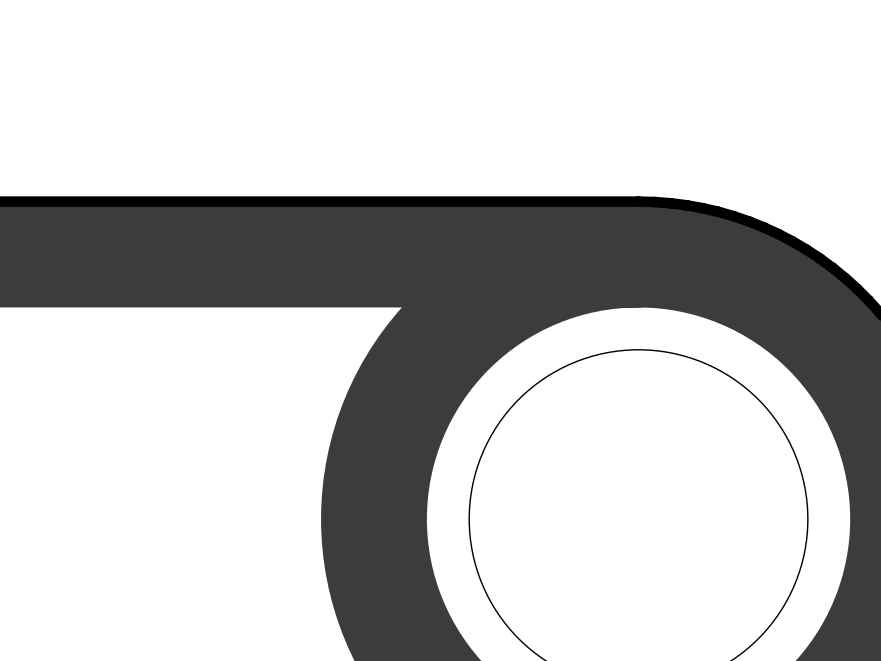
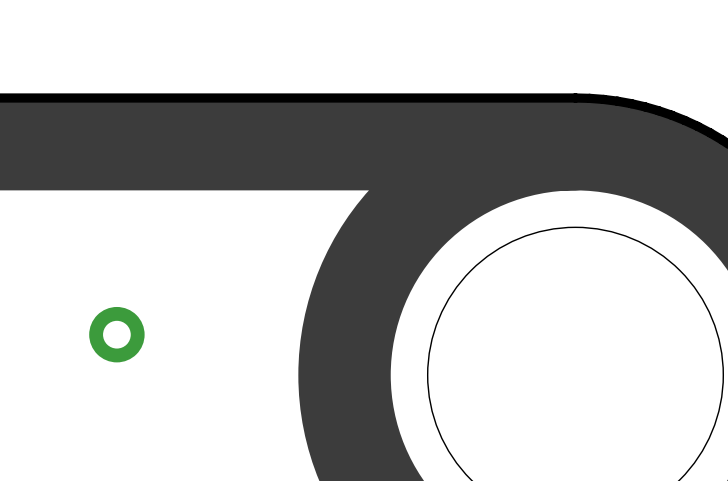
via: none -> (116, 334)

